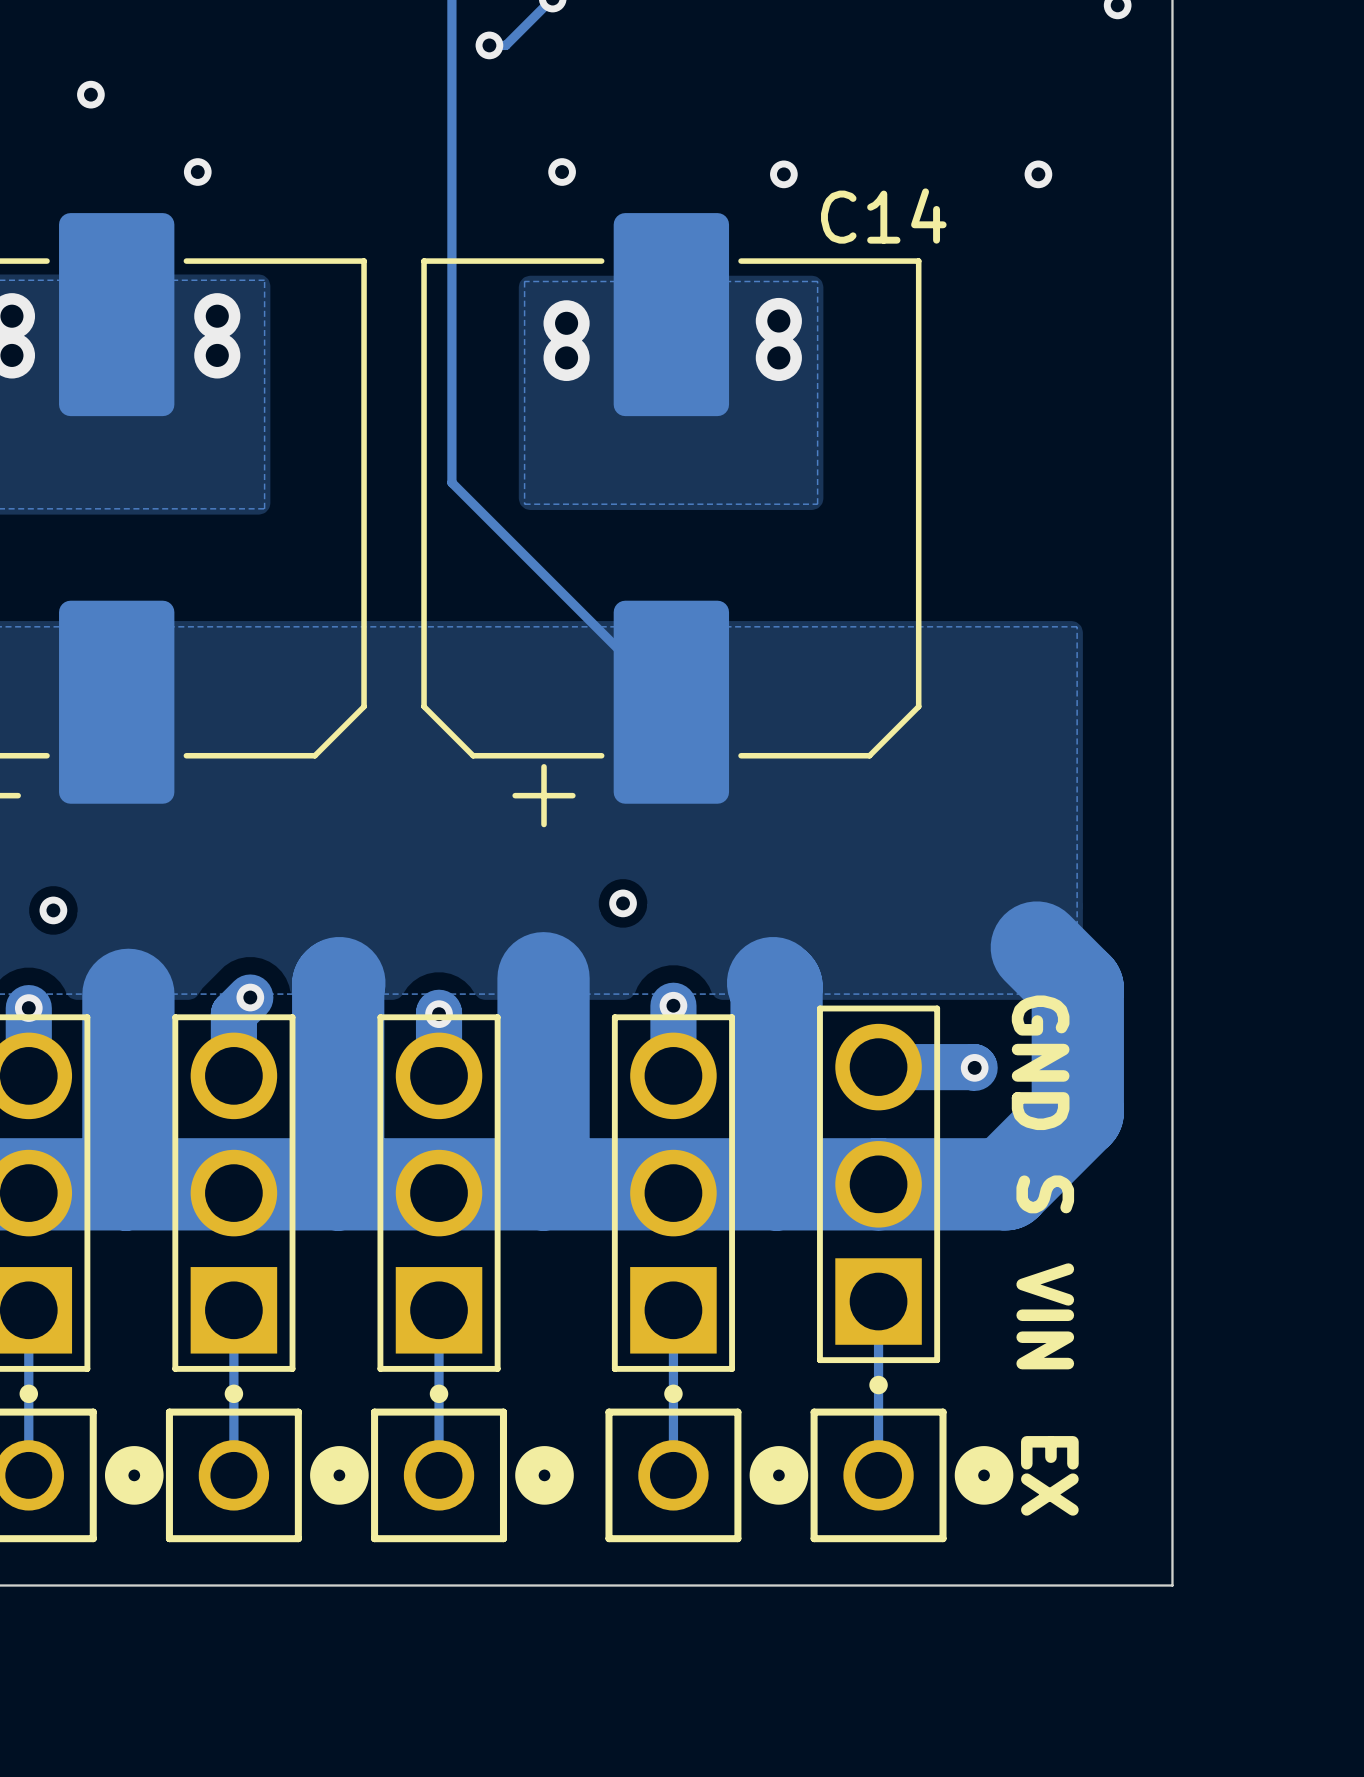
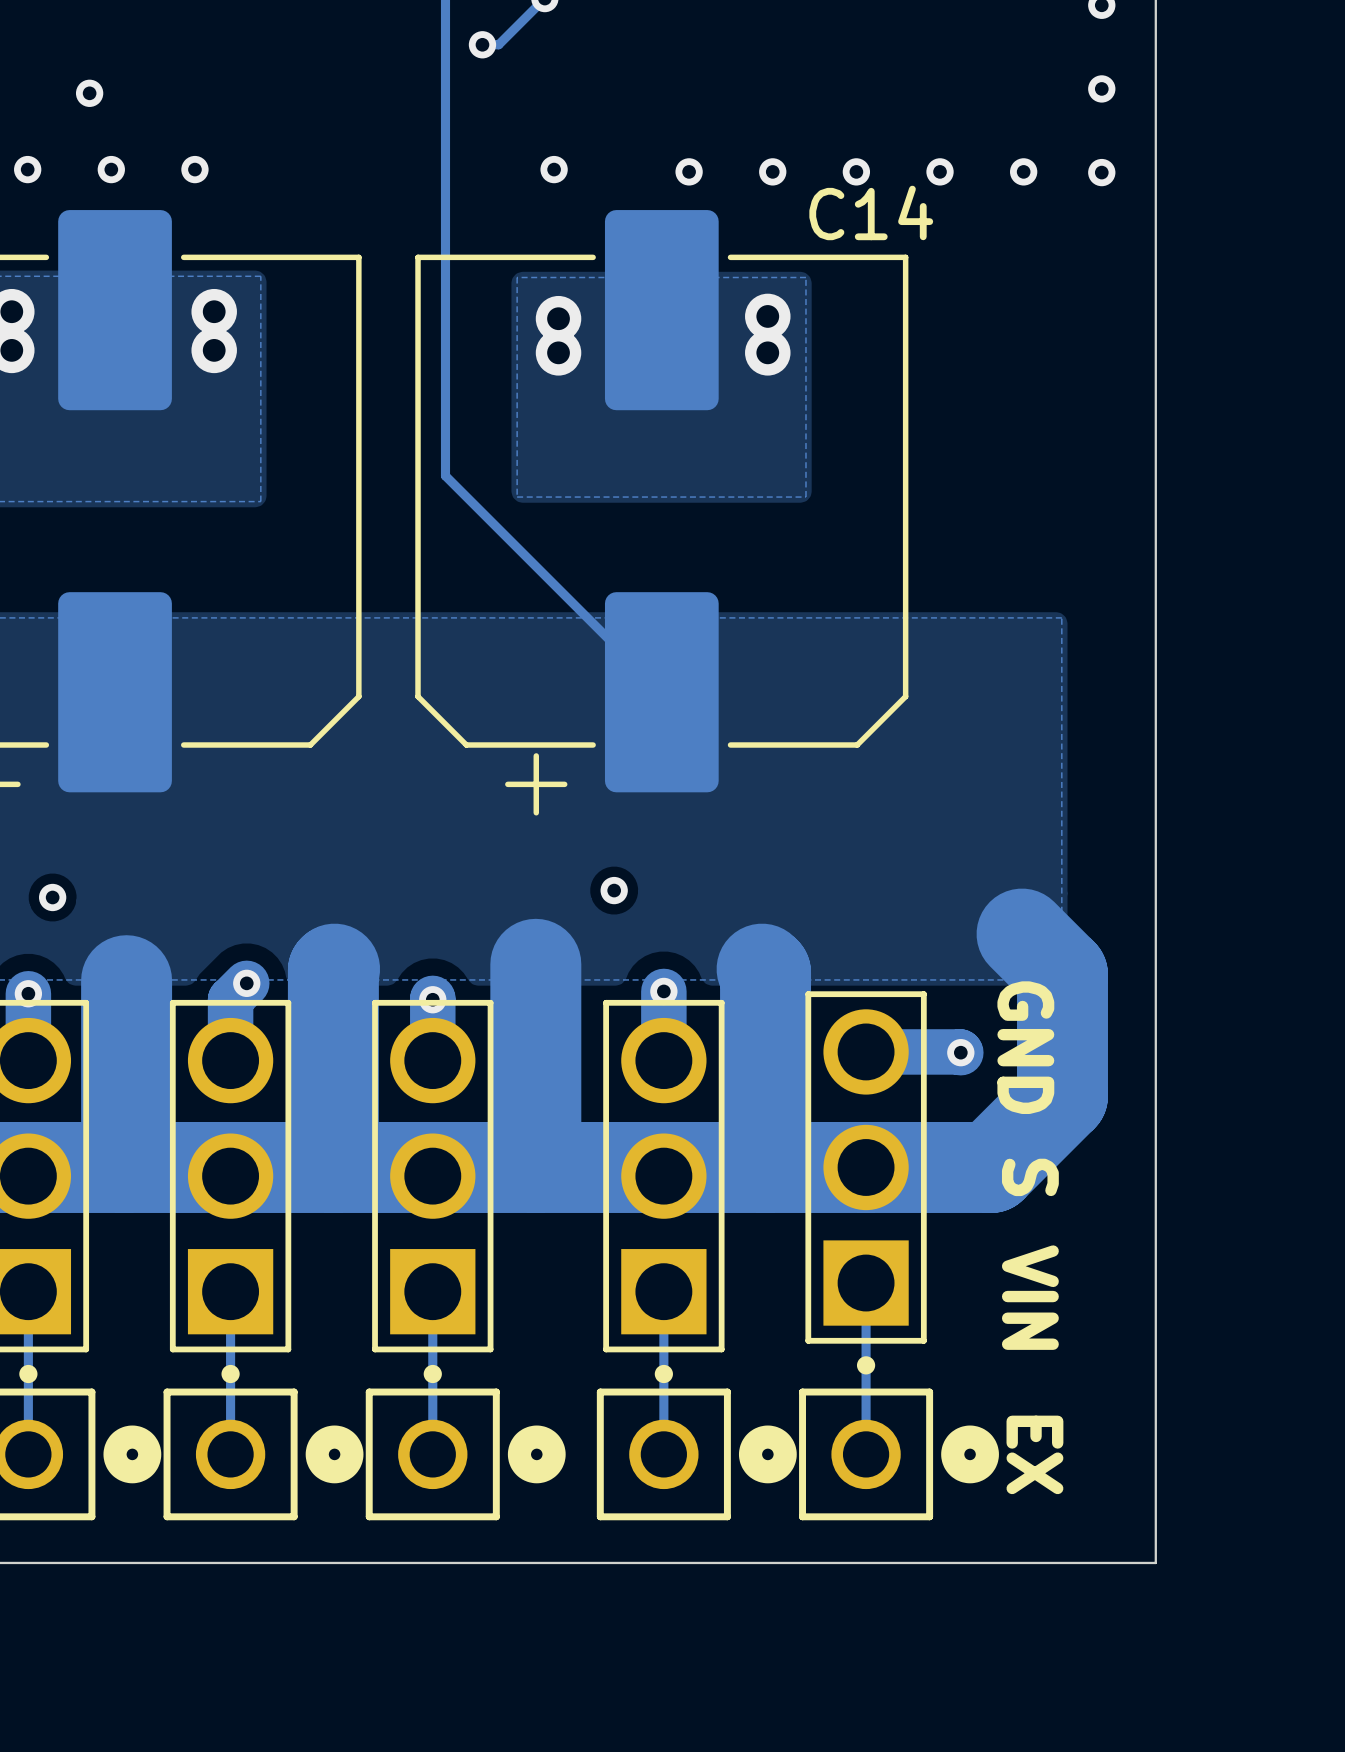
via: none -> (1101, 88)
via: none -> (27, 169)
via: none -> (111, 169)
via: none -> (689, 171)
via: none -> (856, 171)
via: none -> (940, 171)
via: none -> (1101, 172)

